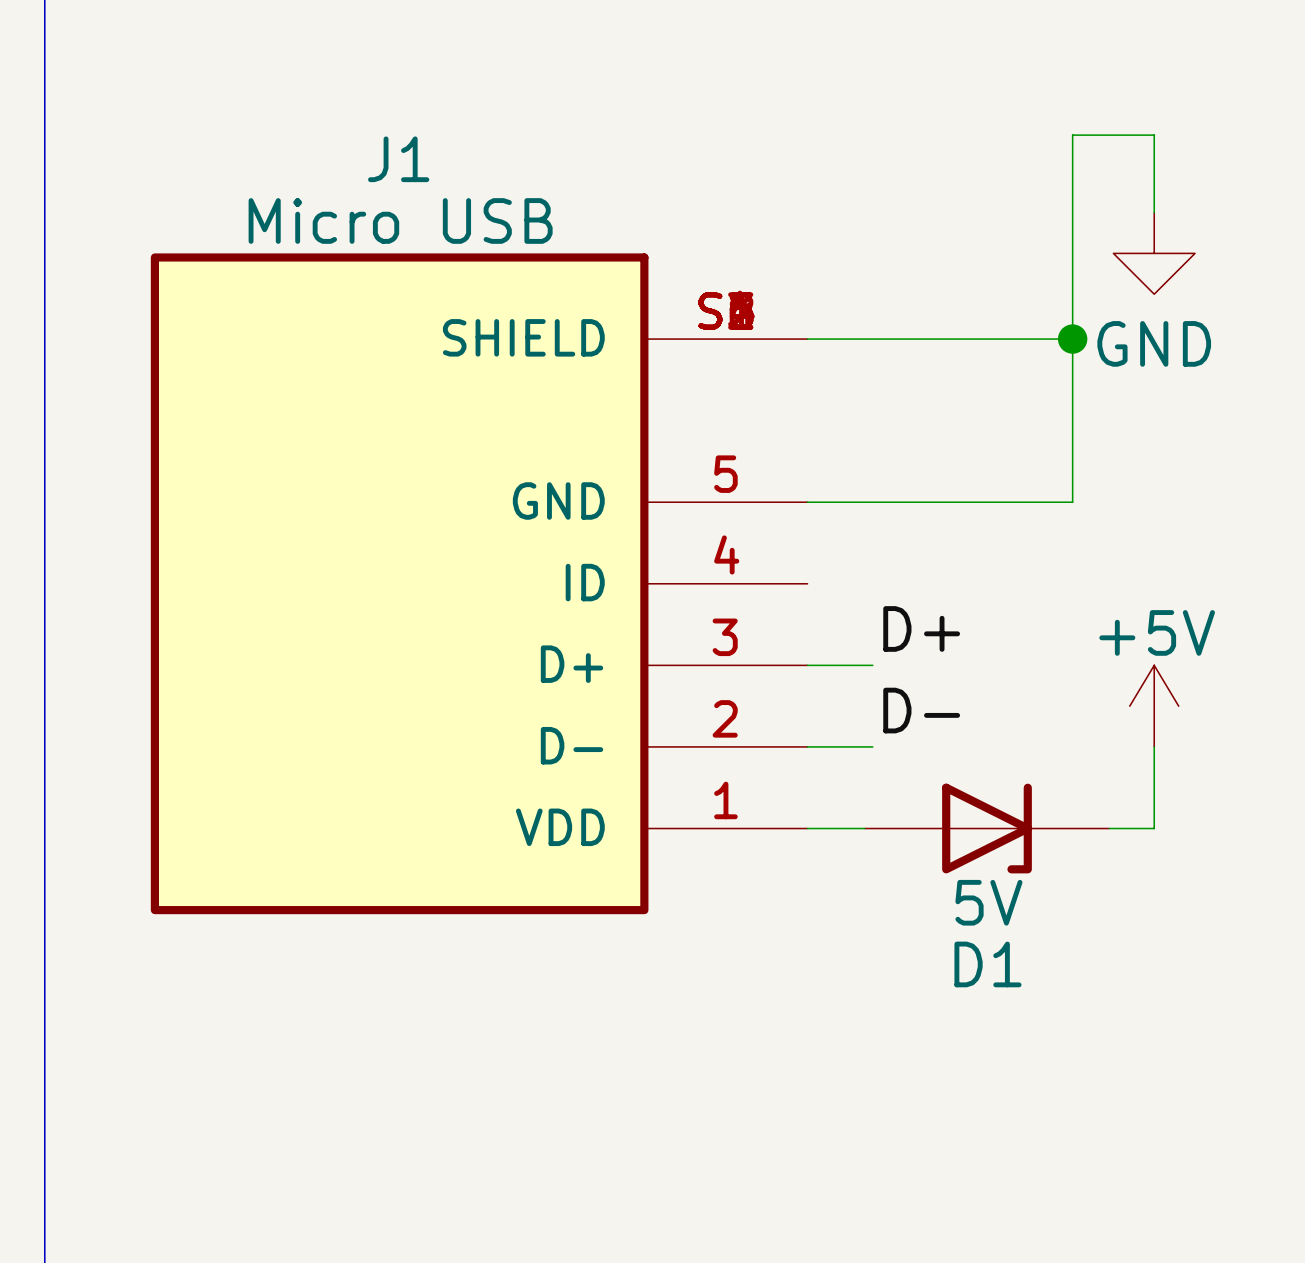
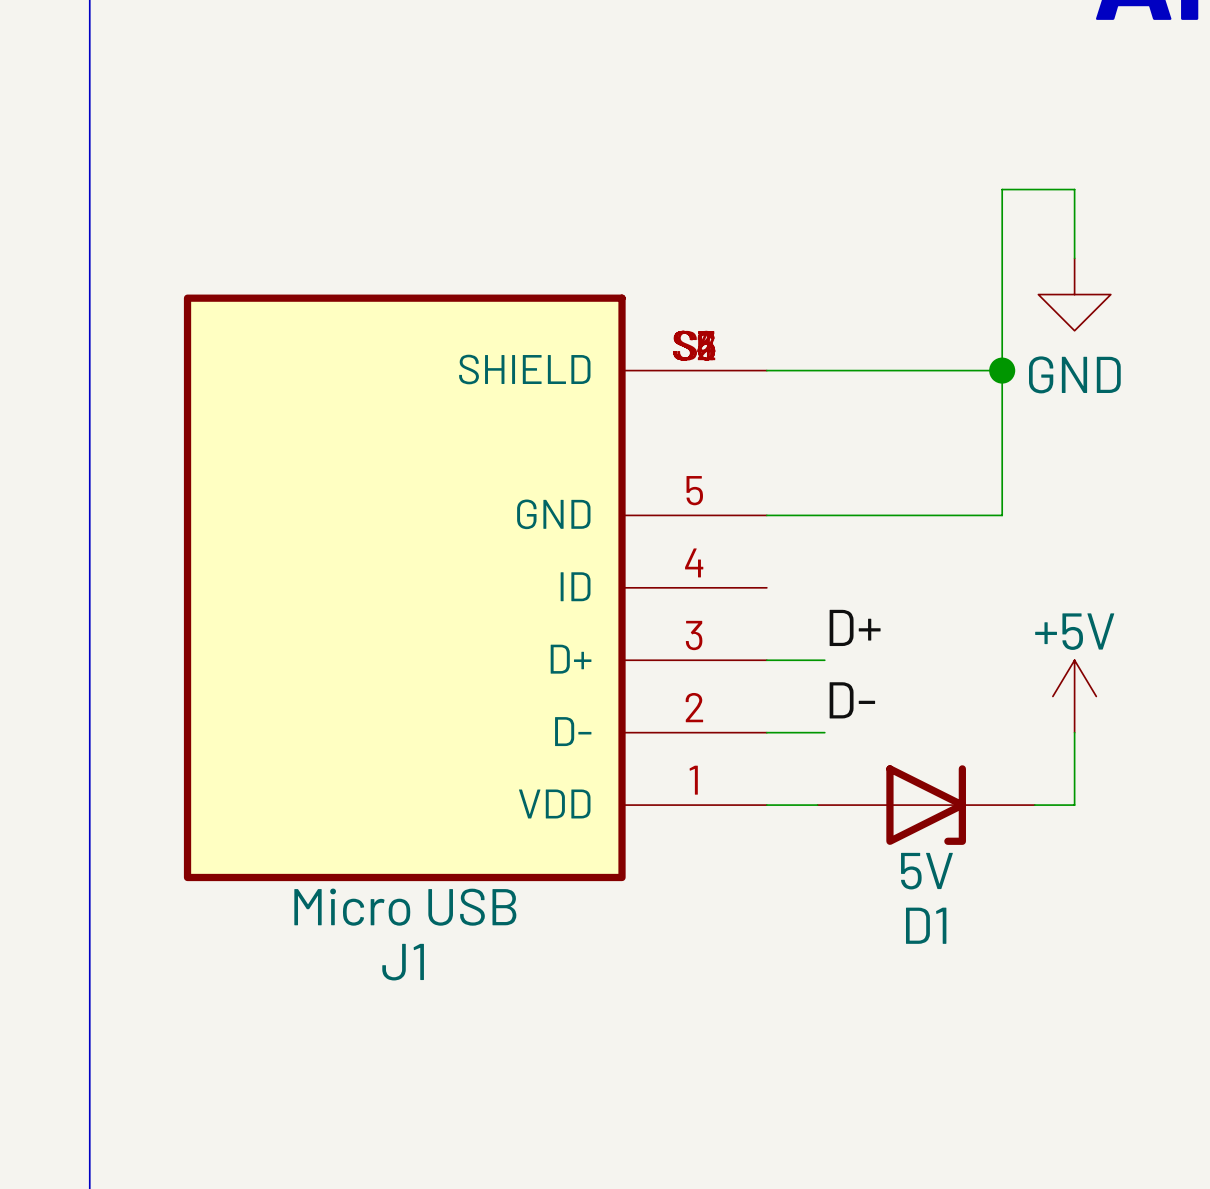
J1 name position: J1 (398, 159) -> J1 (403, 962)
J1 value position: Micro USB (400, 220) -> Micro USB (405, 907)

